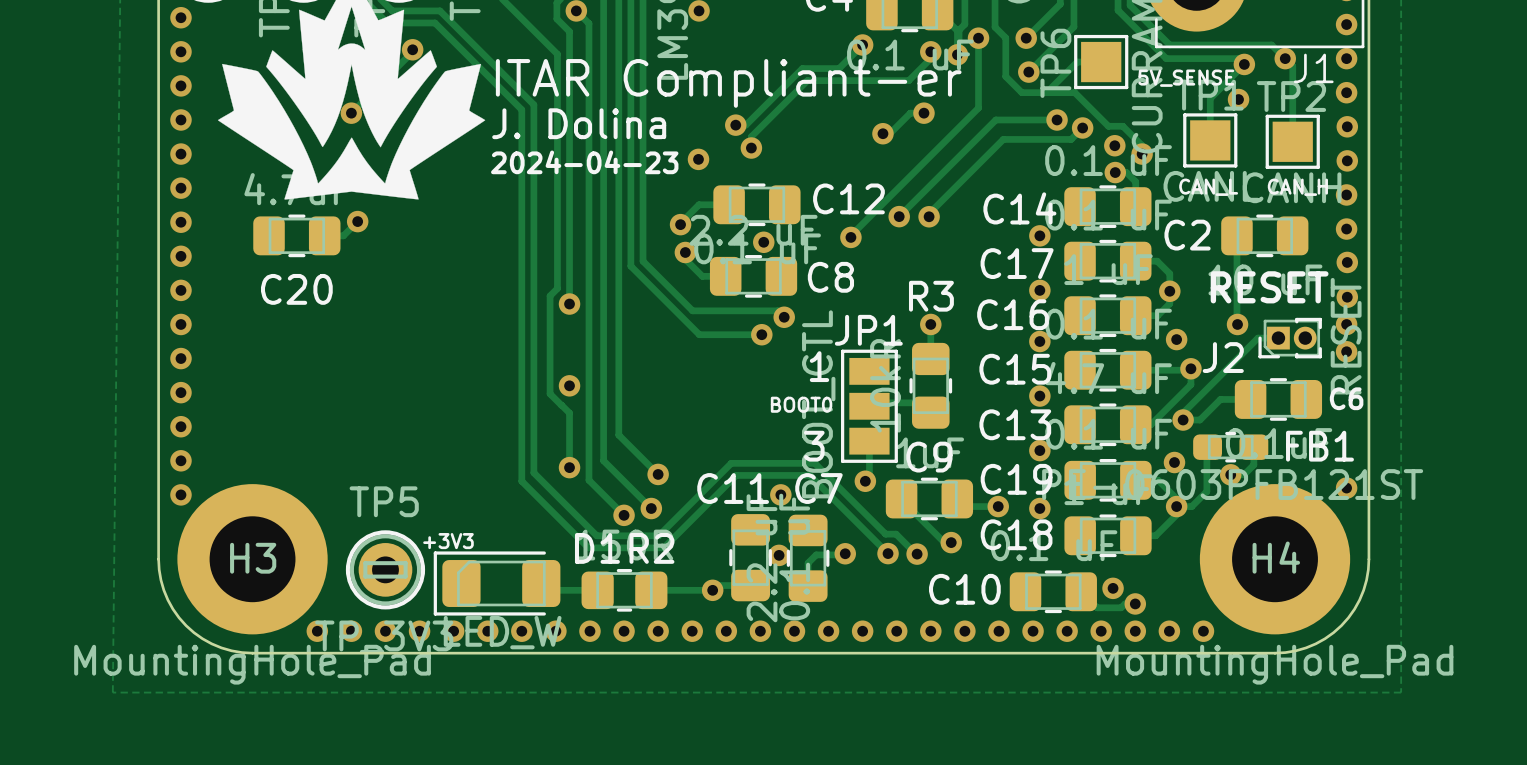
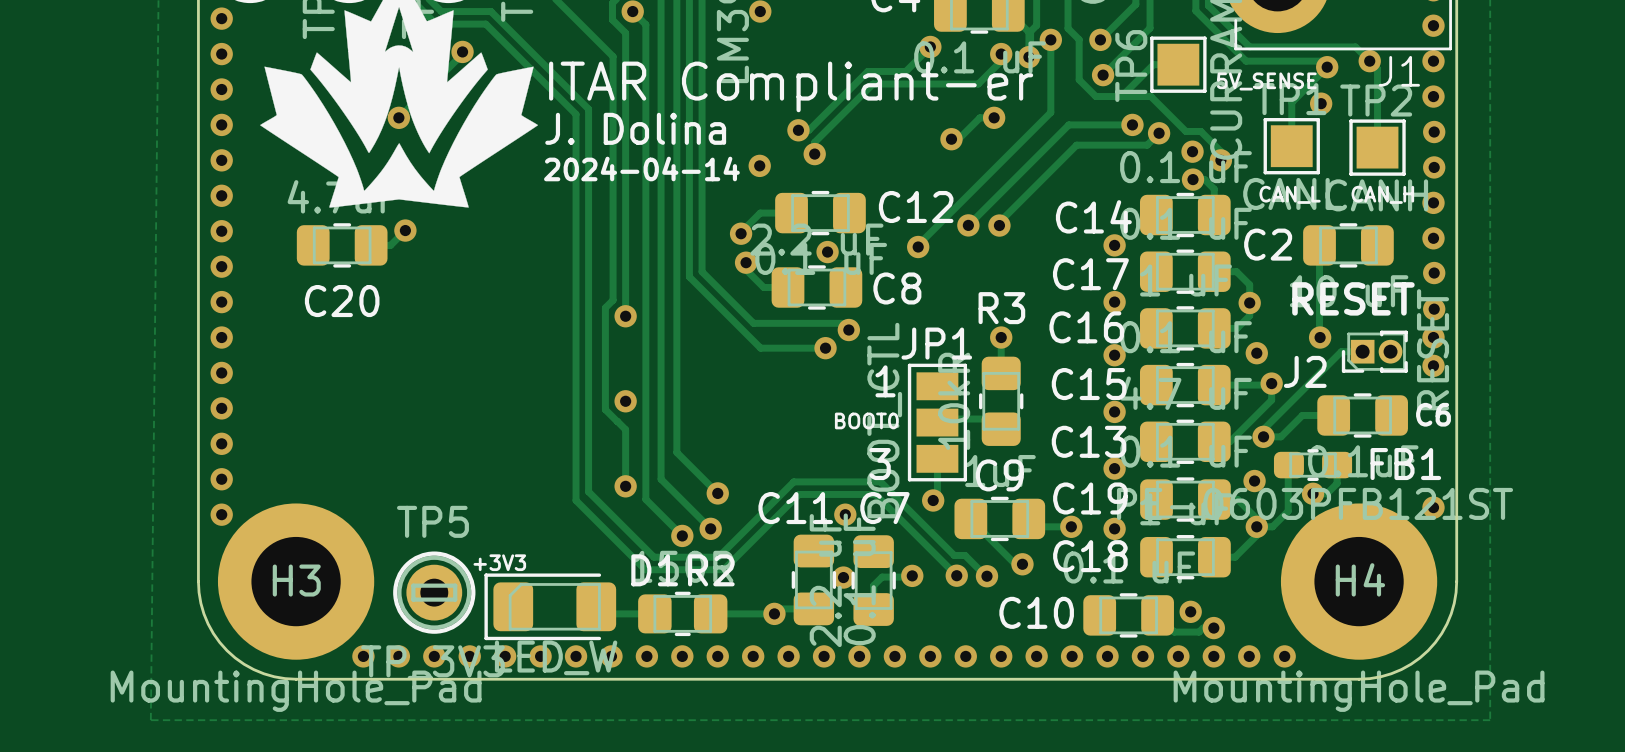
text: 2024-04-23 (584, 162) -> 2024-04-14 (641, 168)

